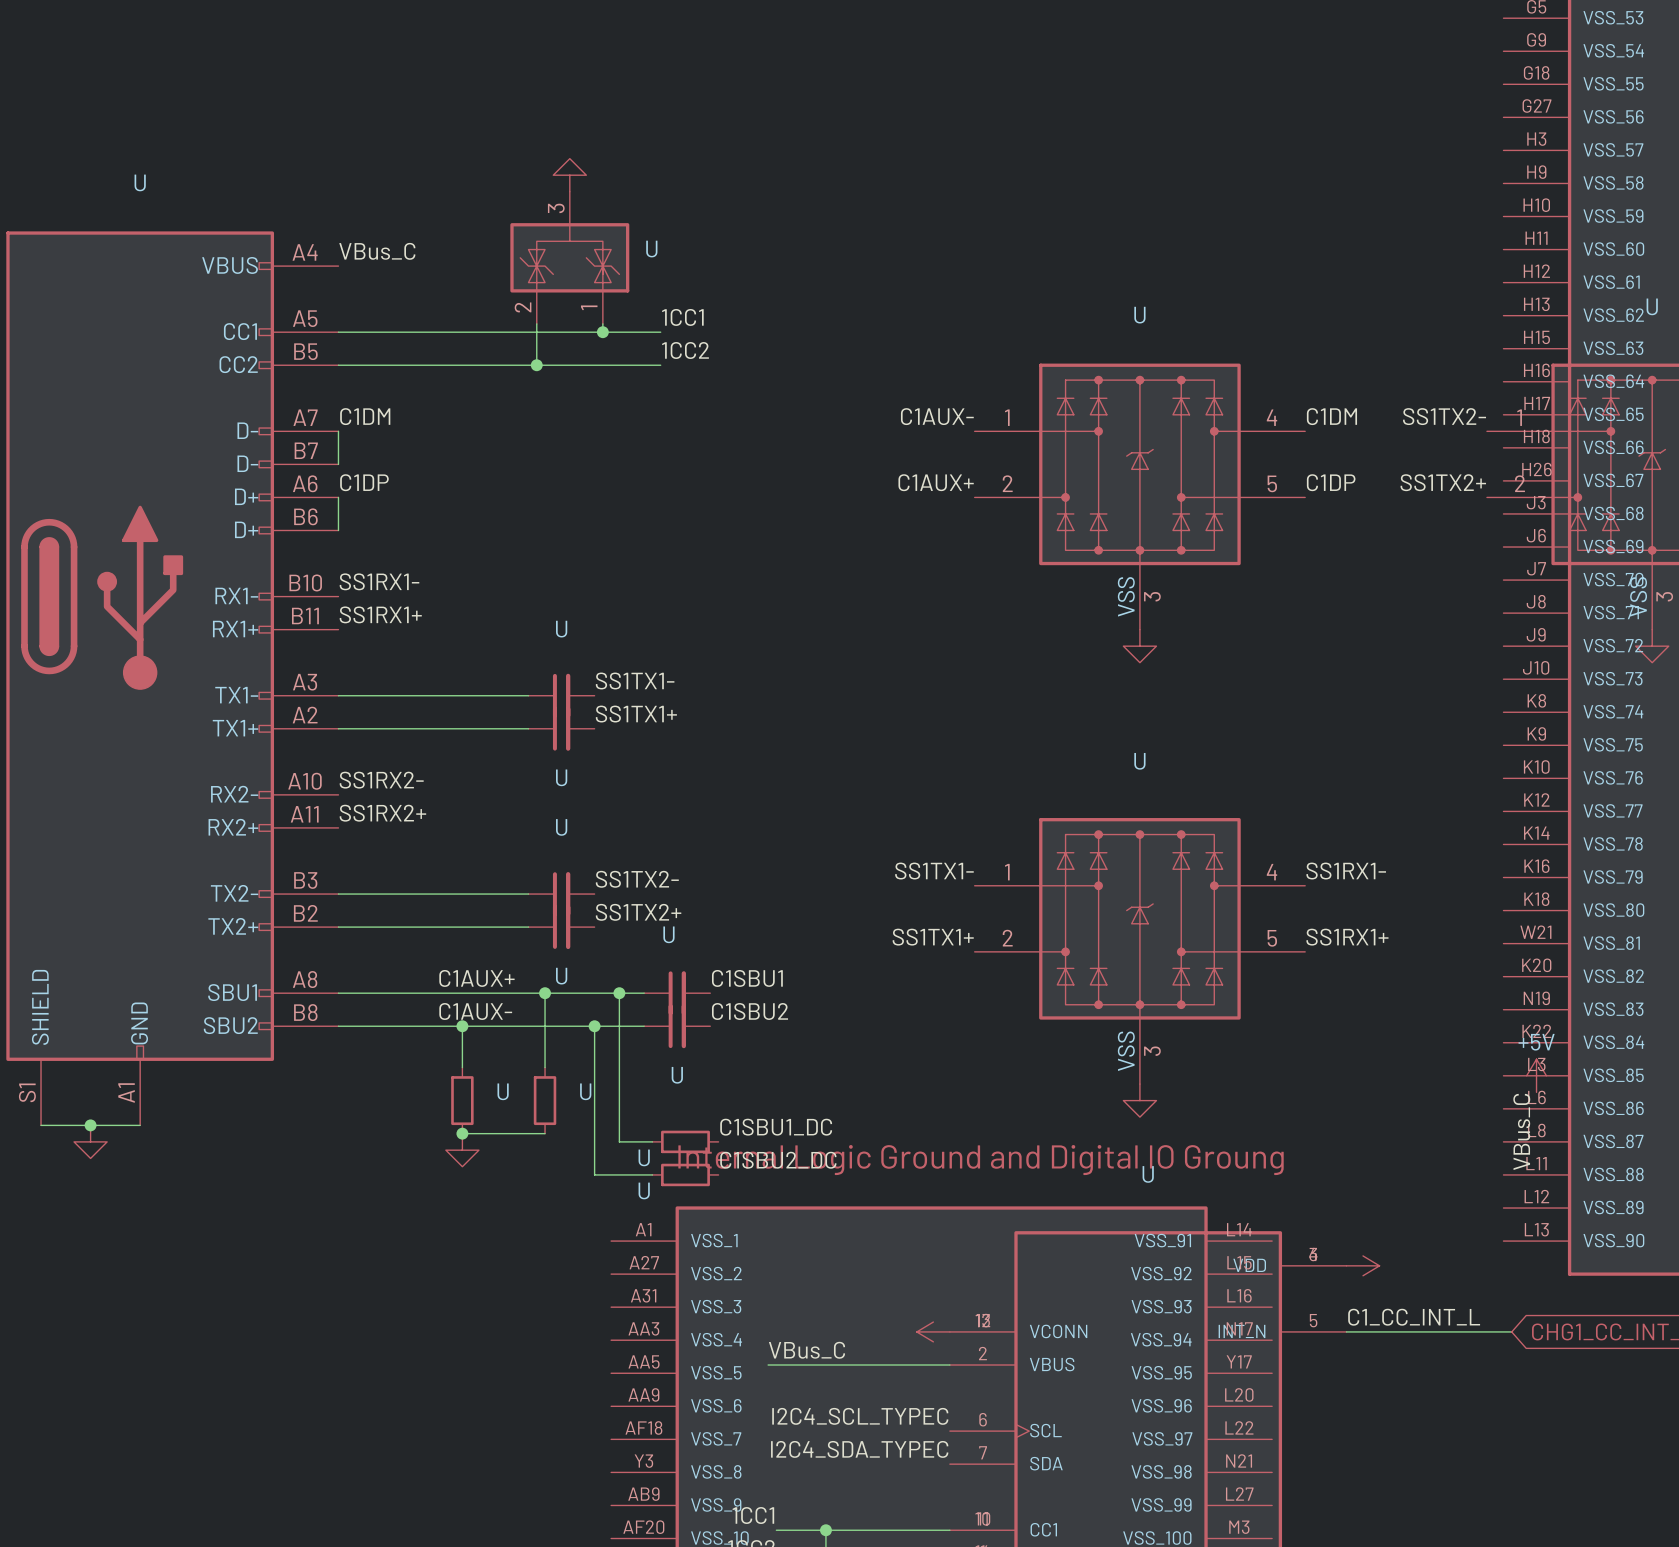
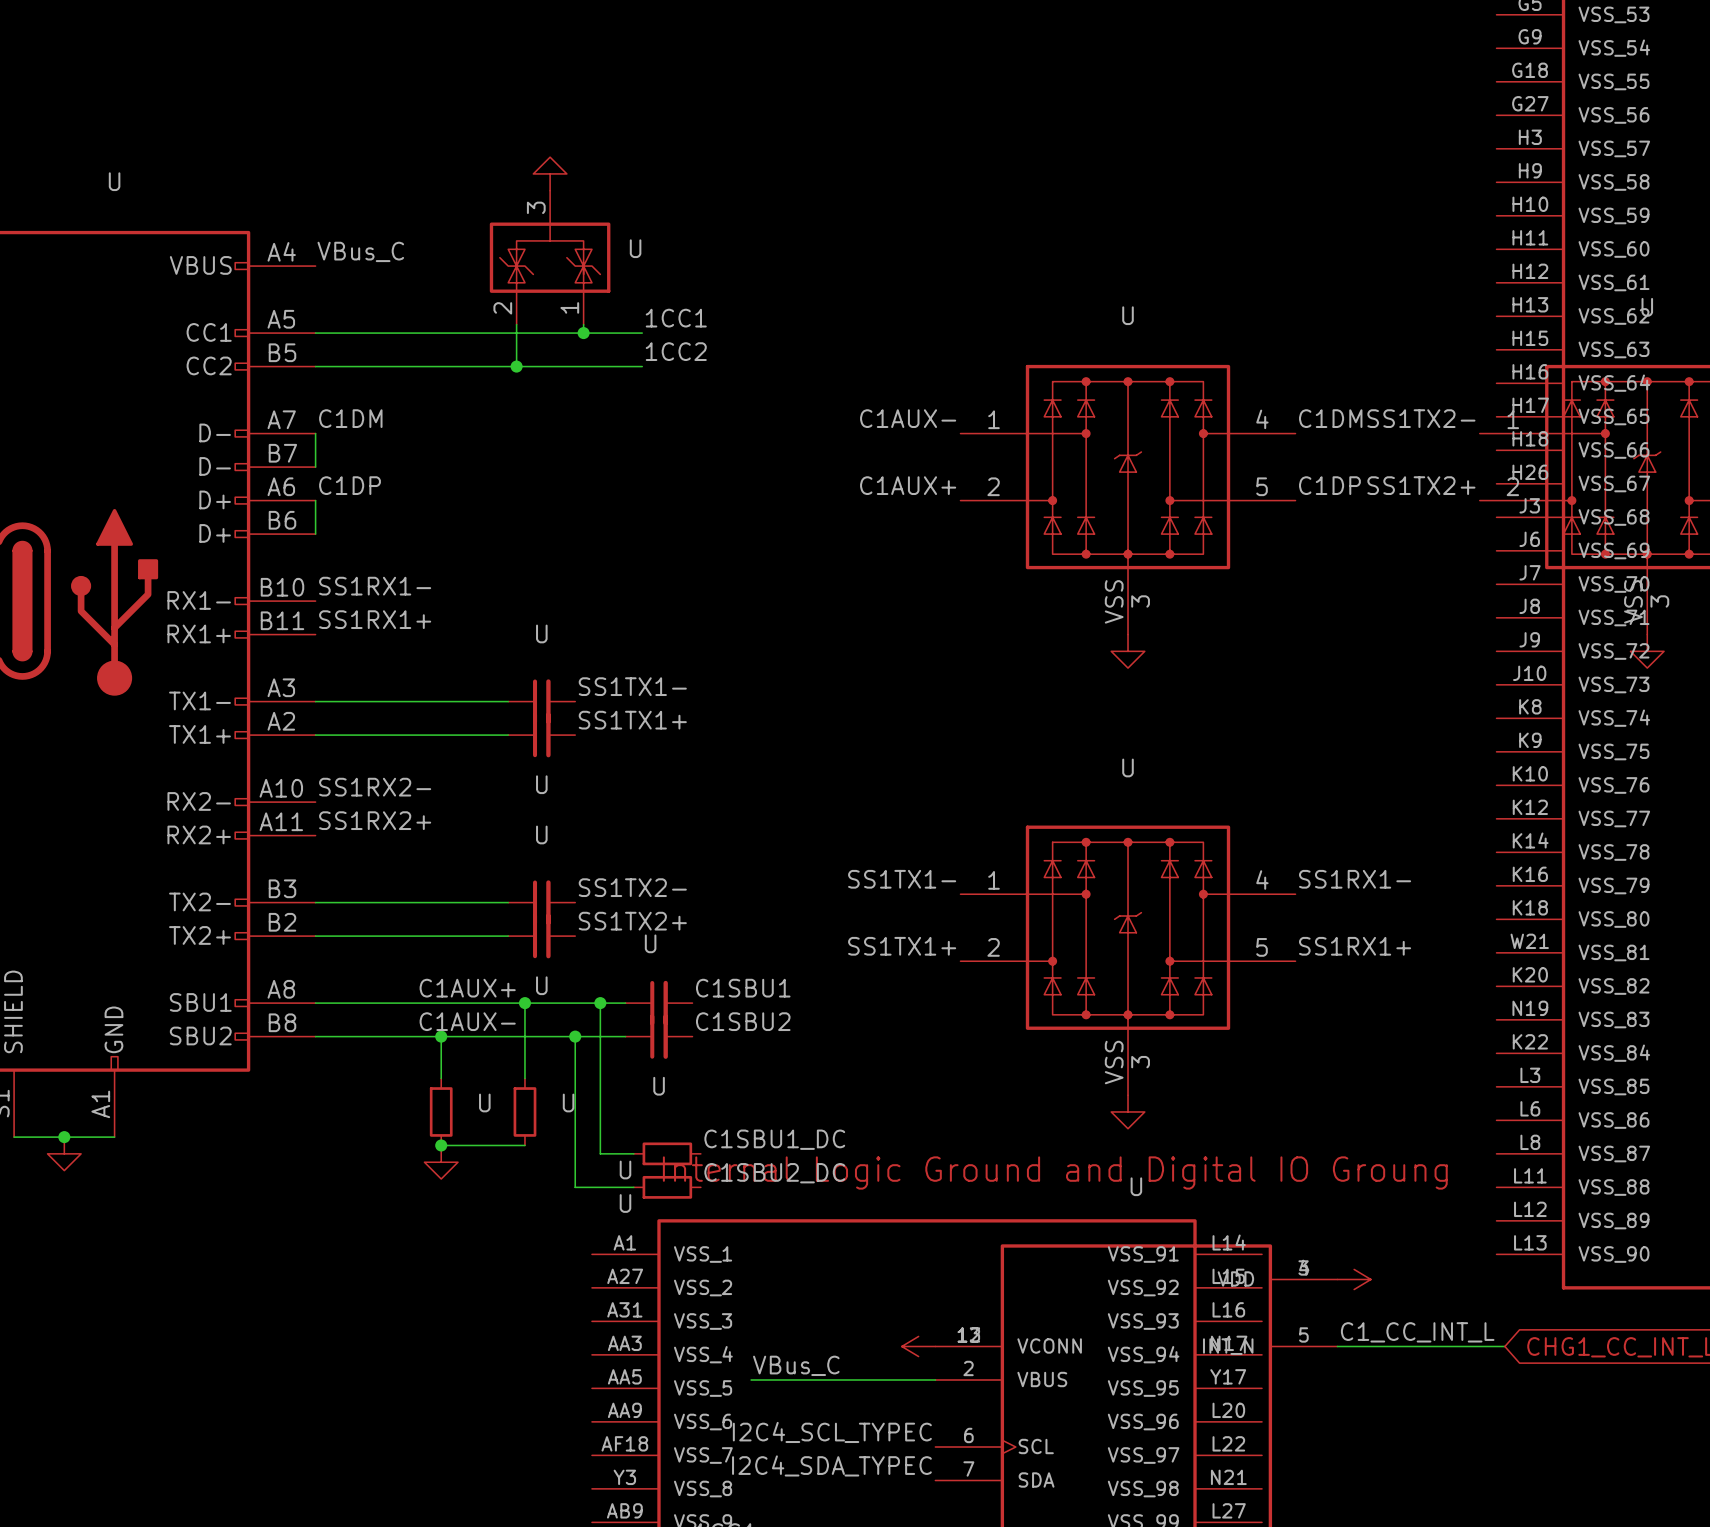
power symbol: +5V (1536, 1075) -> none
label: VBus_C (1521, 1131) -> none

